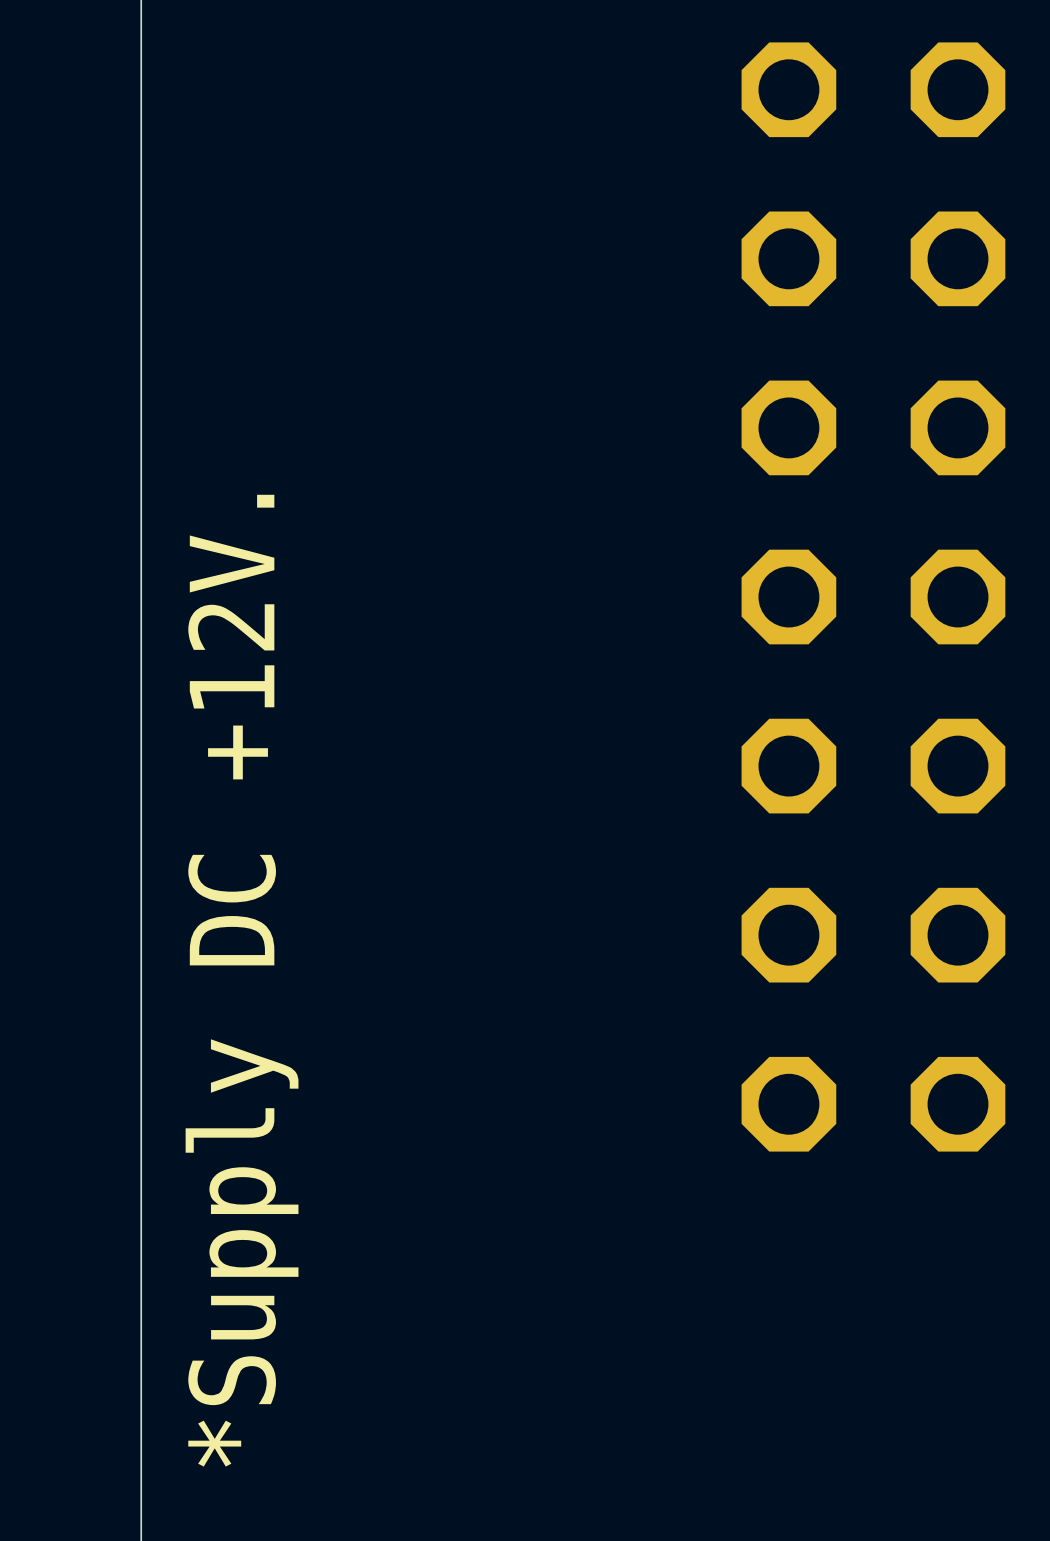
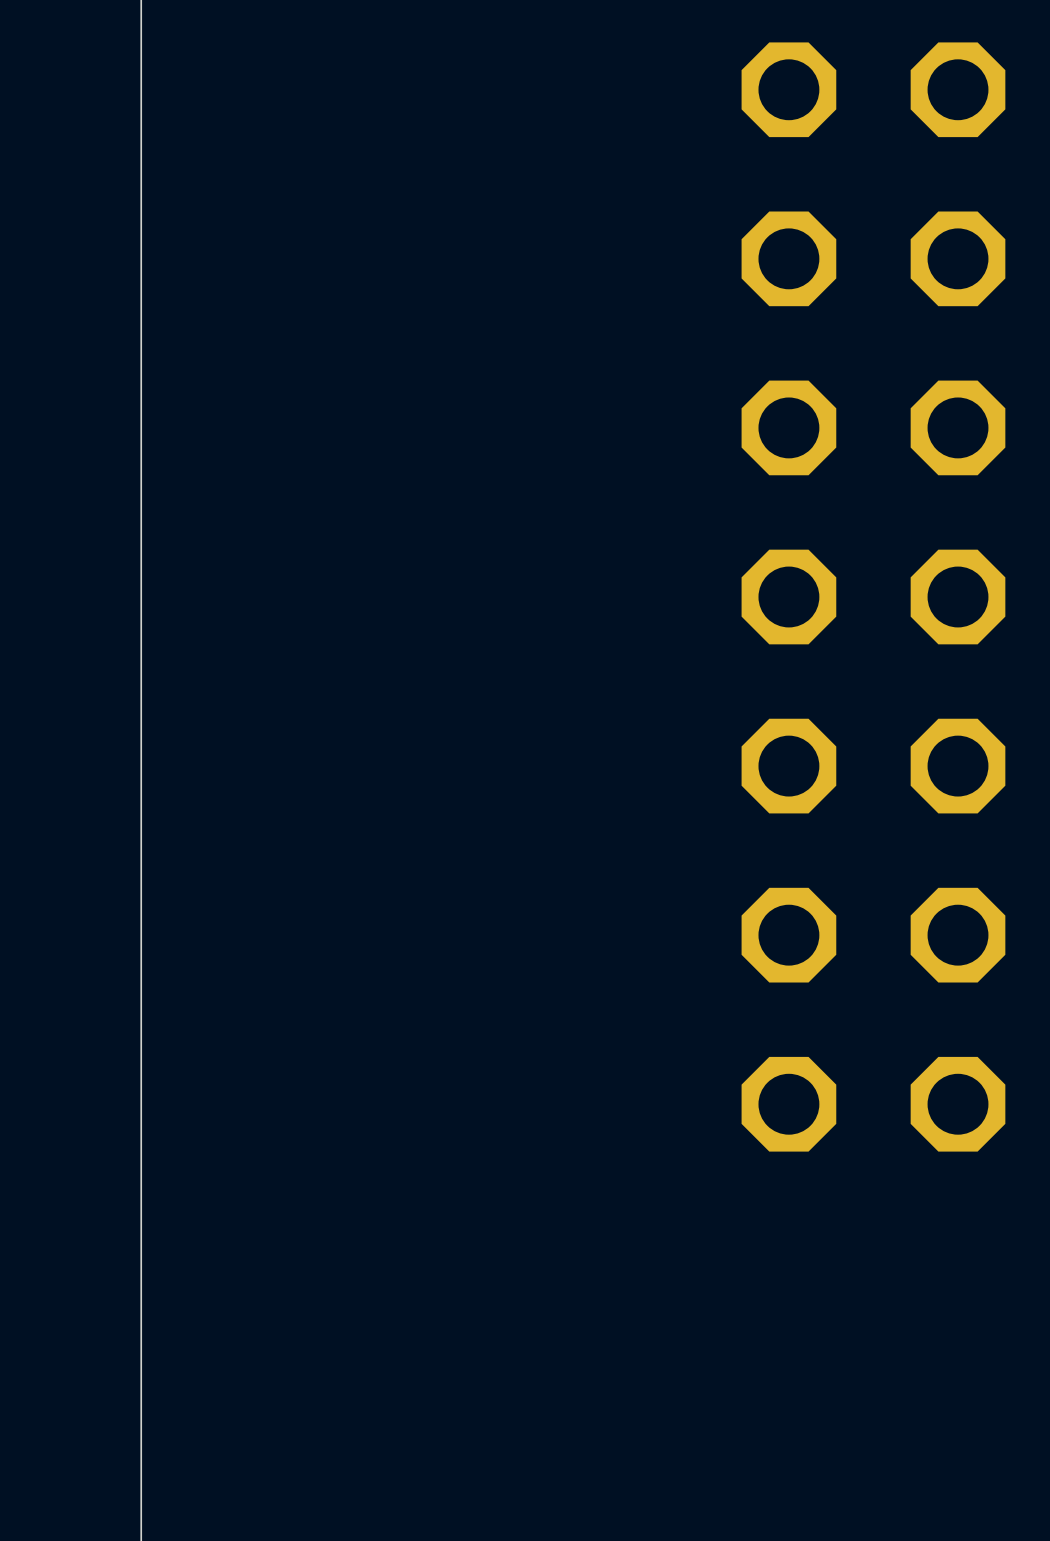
text: *Supply DC +12V. (242, 980) -> none

